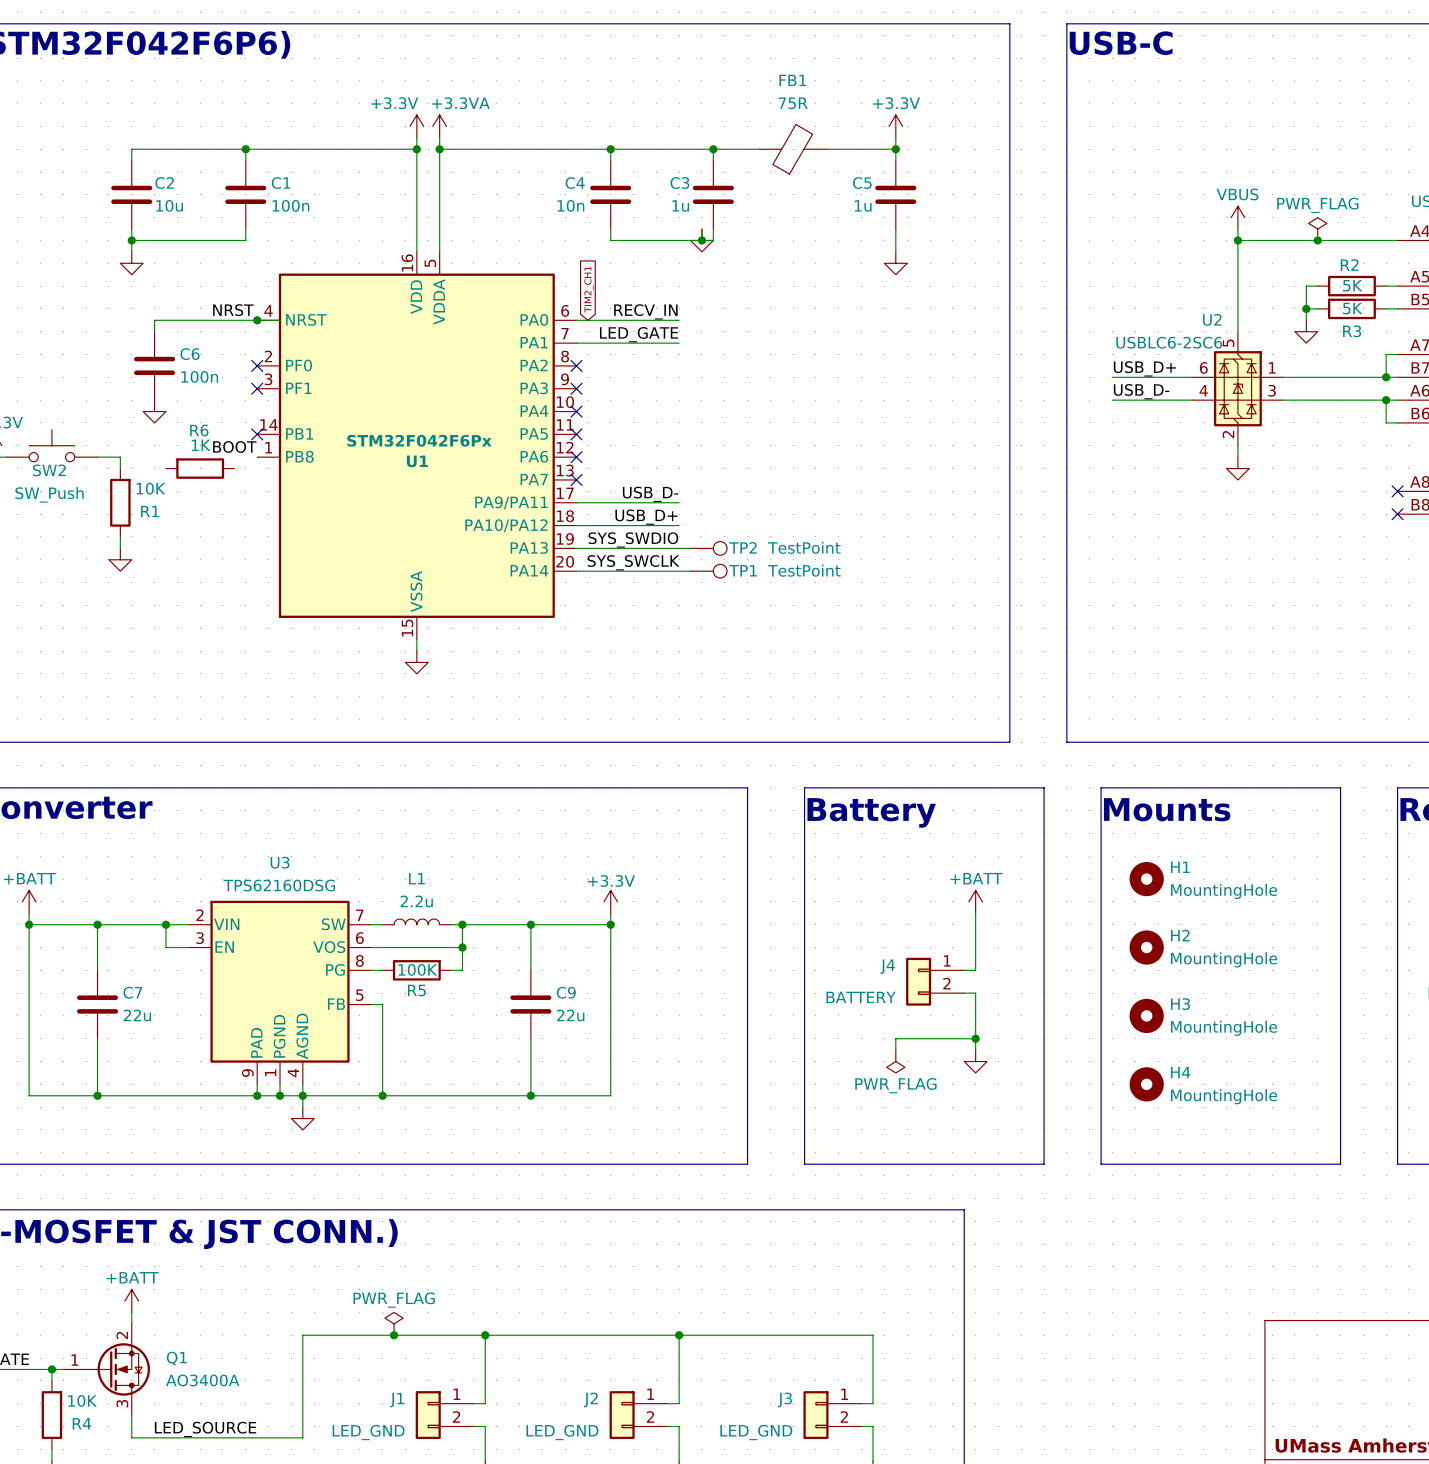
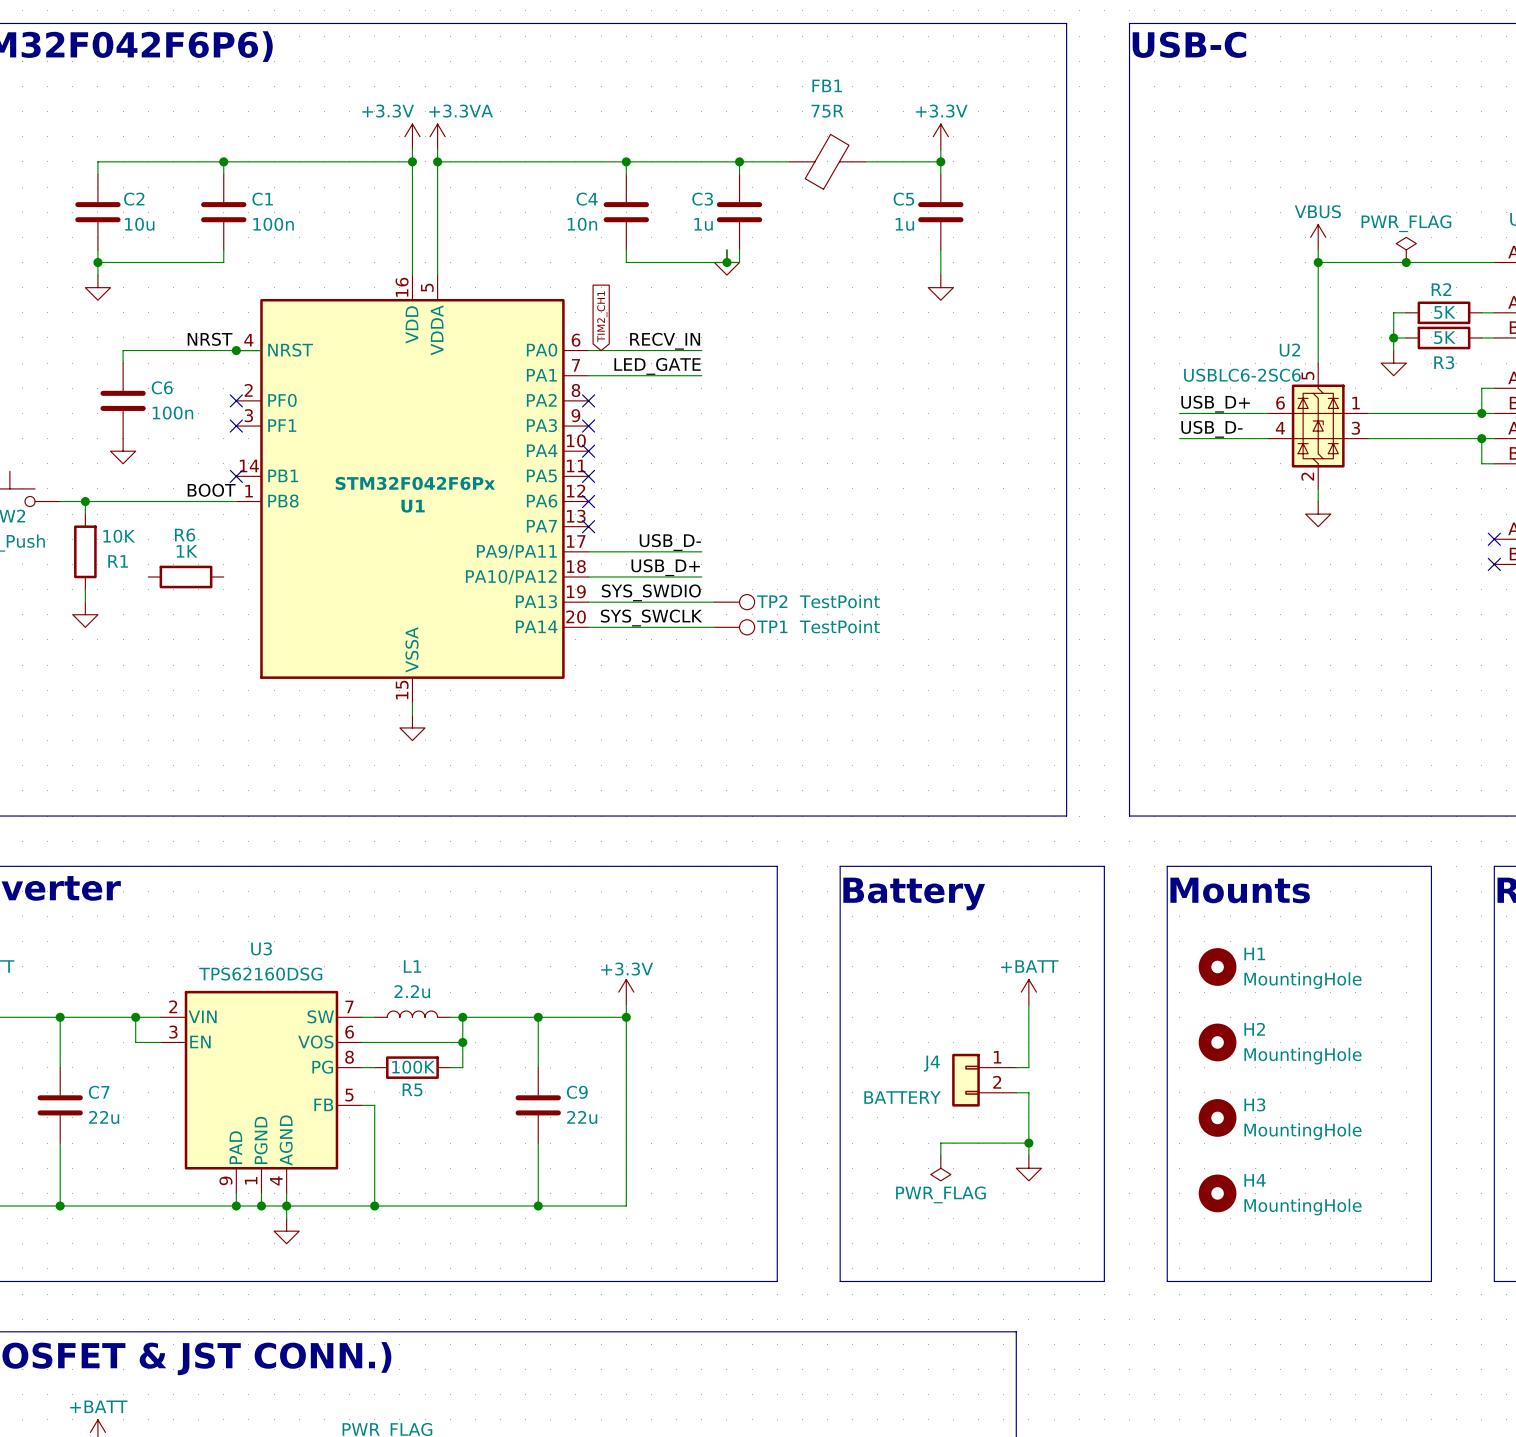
wire: none -> (85, 501) (236, 501)
junction: none -> (85, 501)
R6 position: (200, 468) -> (186, 577)

